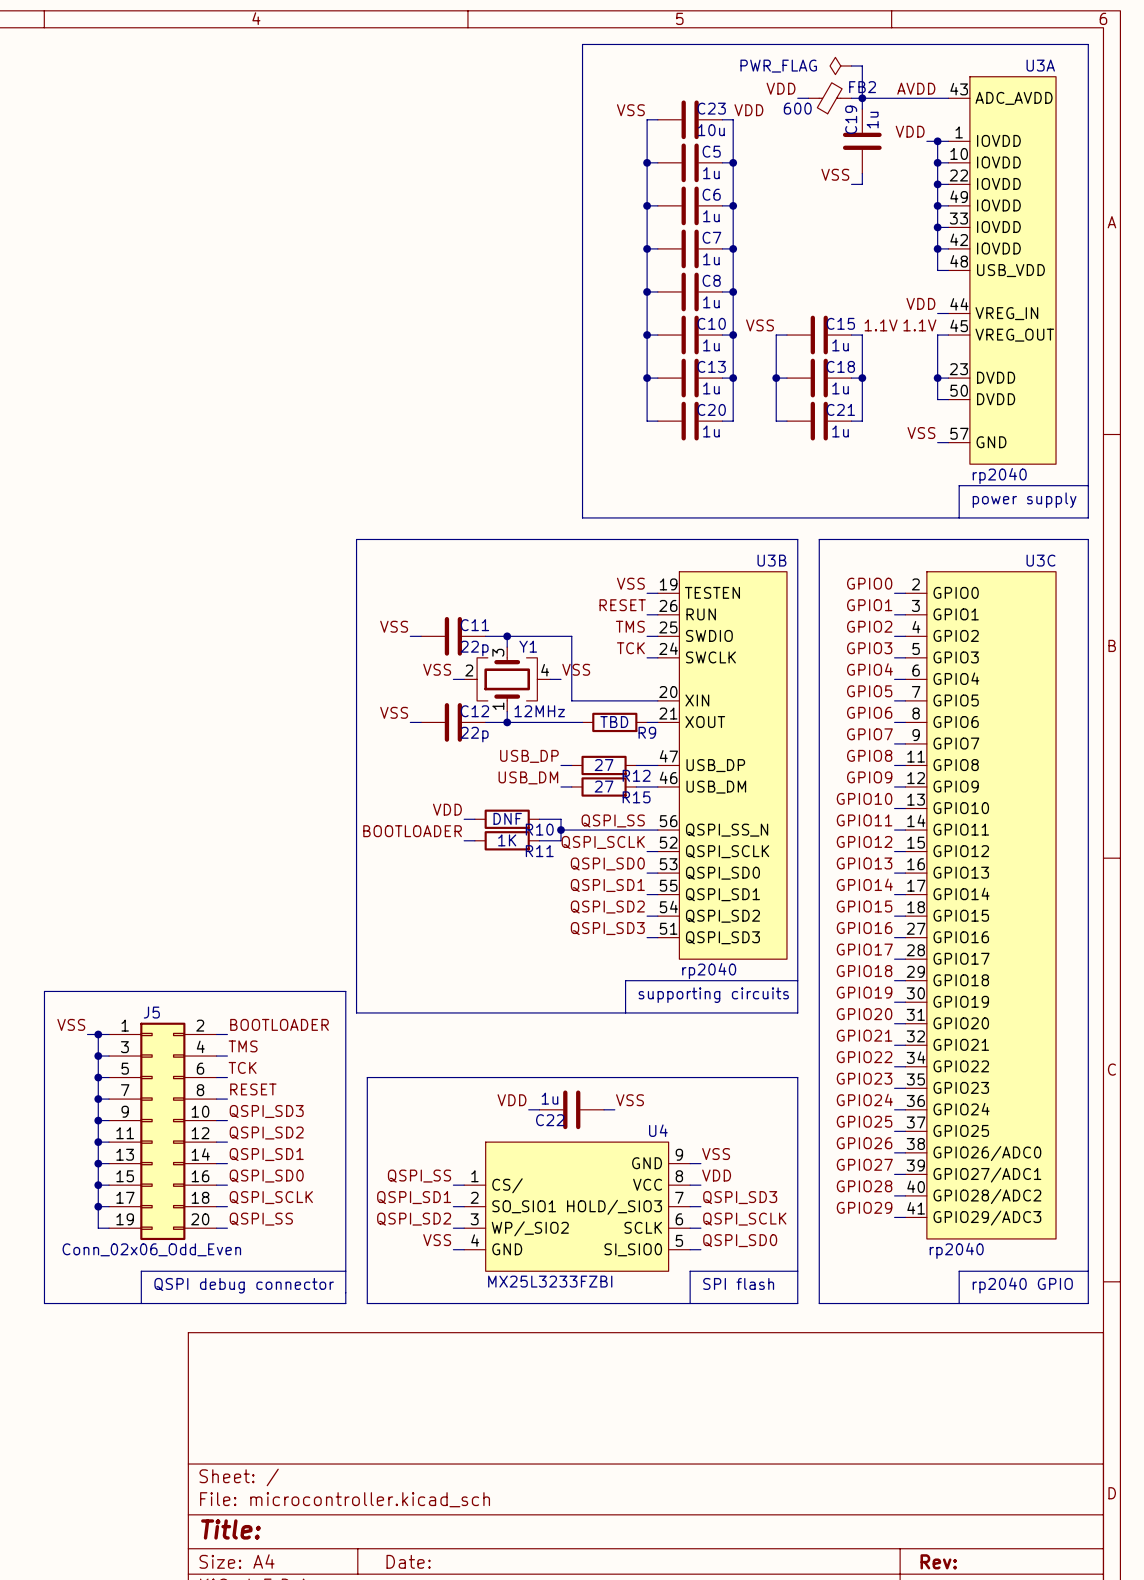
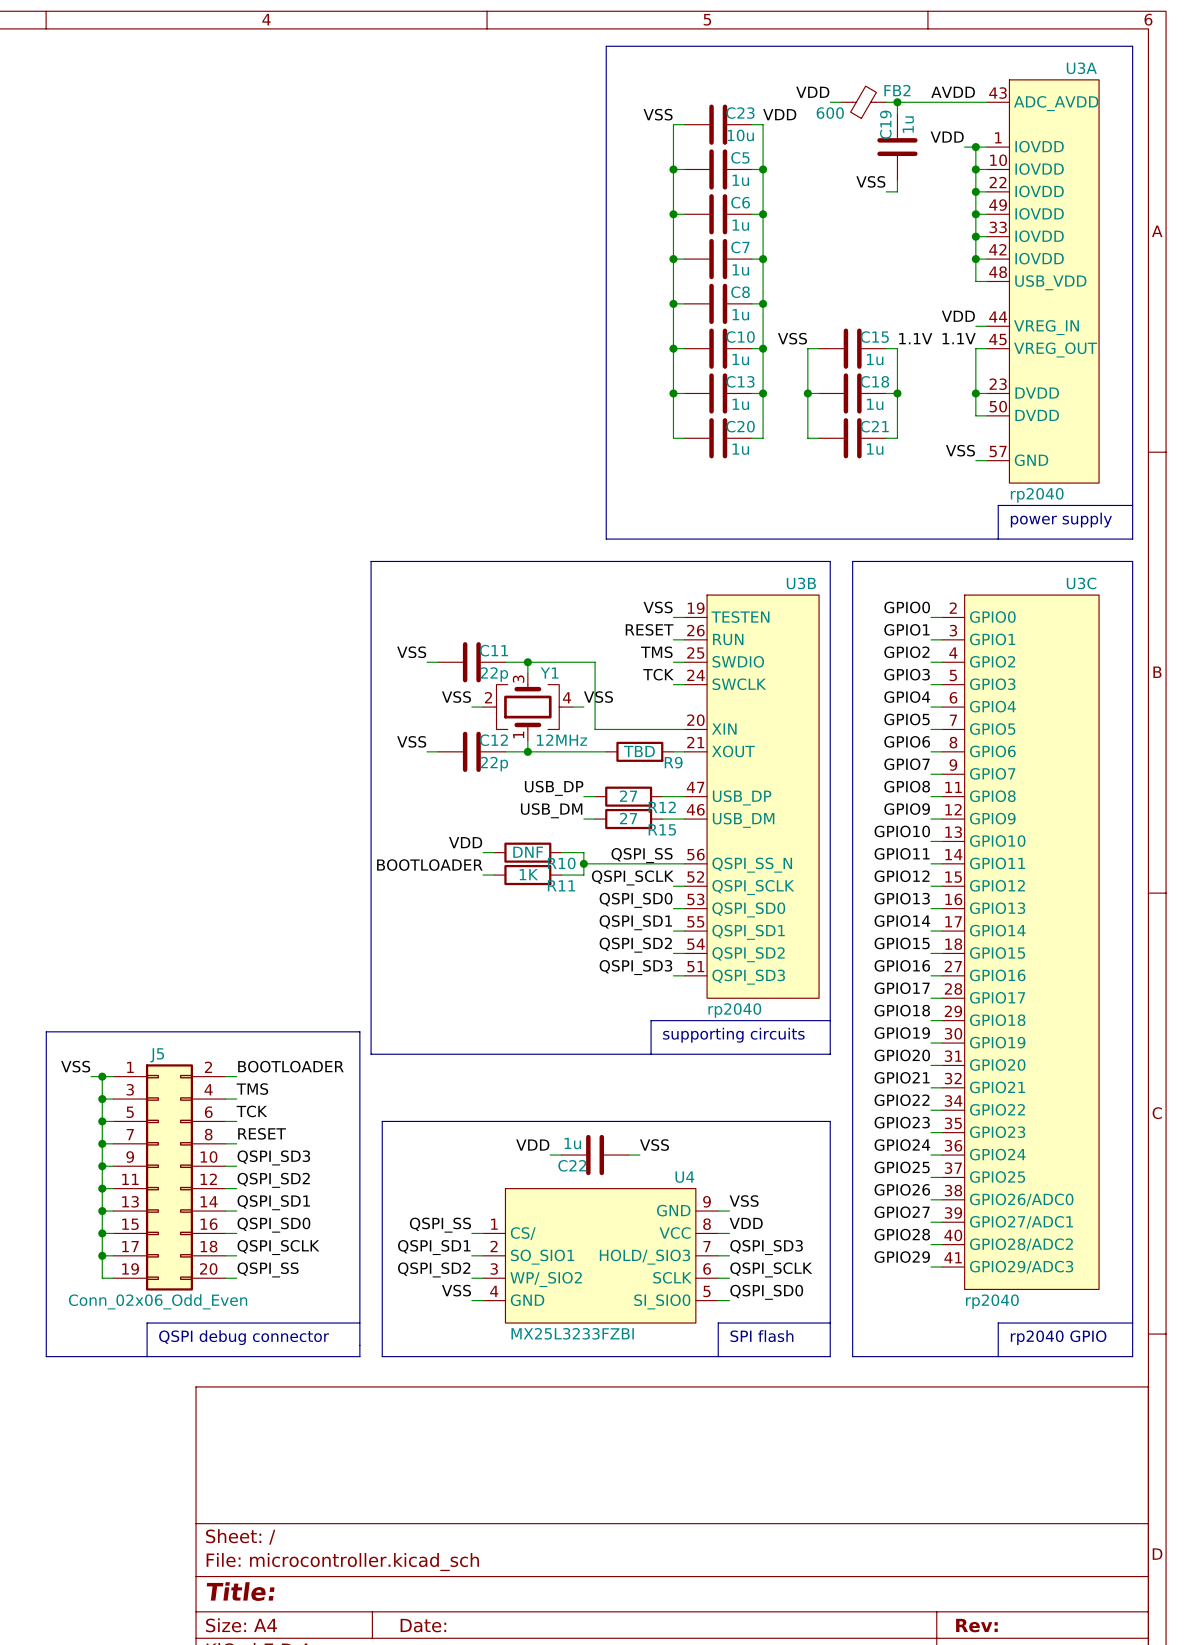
power symbol: PWR_FLAG (840, 65) -> none
wire: (851, 65) (862, 65) (862, 98) -> none

